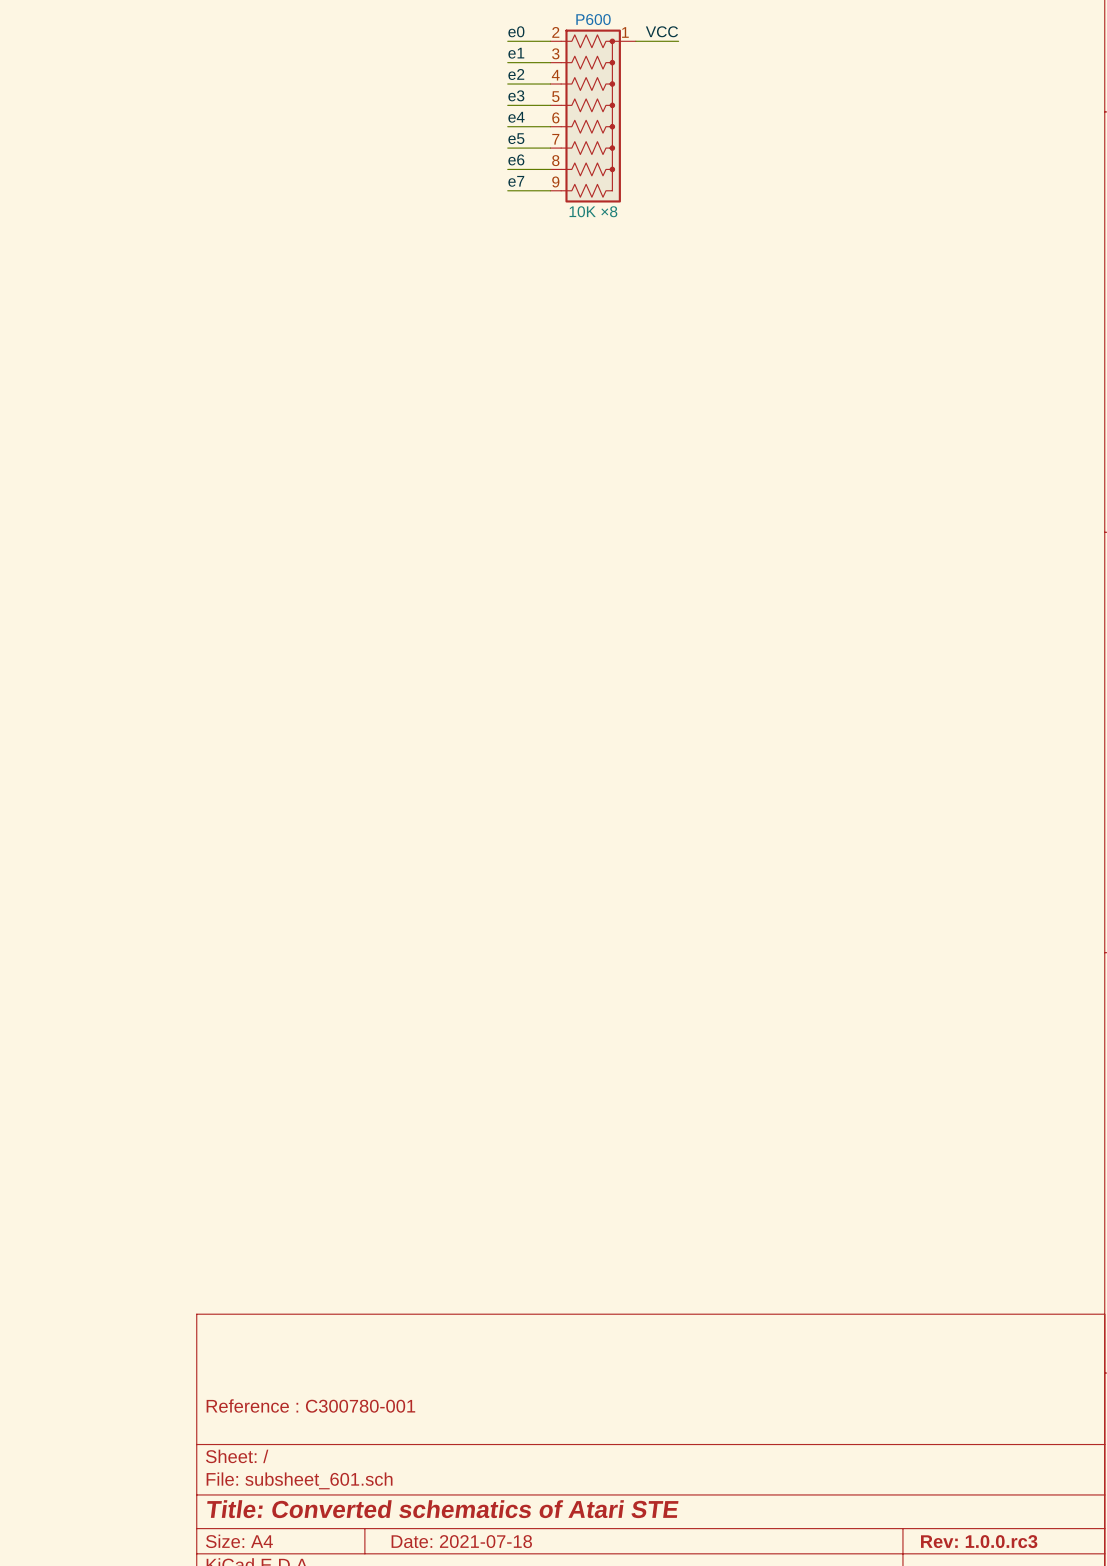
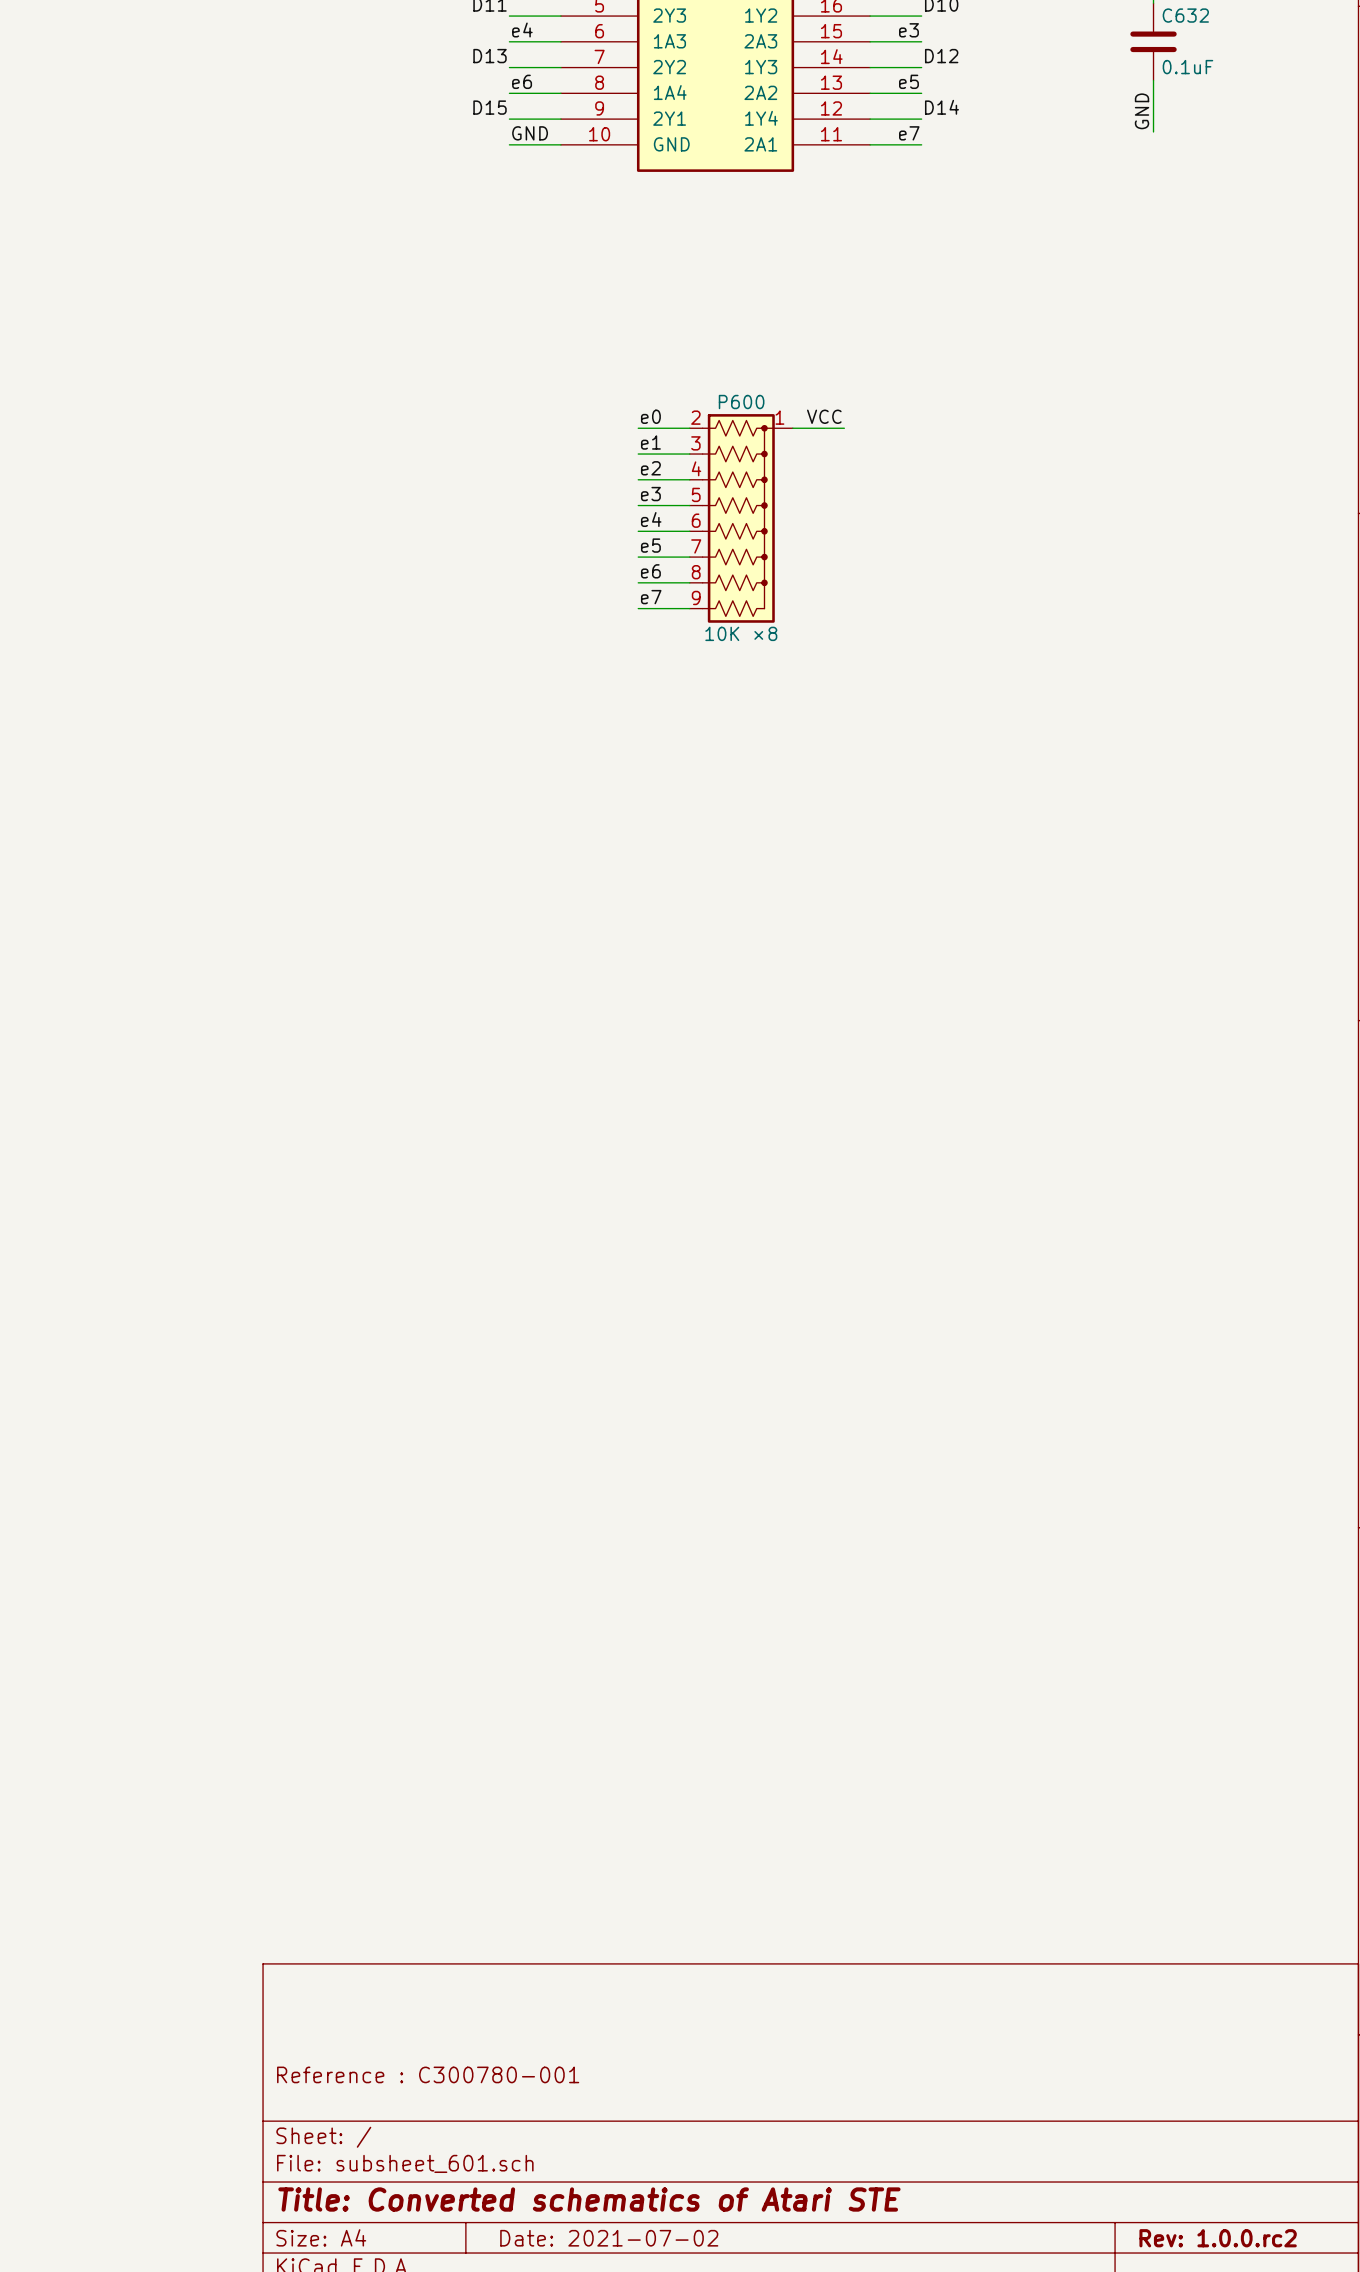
title block: Date: 2021-07-18 (461, 1541) -> Date: 2021-07-02 (609, 2238)
title block: Rev: 1.0.0.rc3 (979, 1541) -> Rev: 1.0.0.rc2 (1218, 2238)

